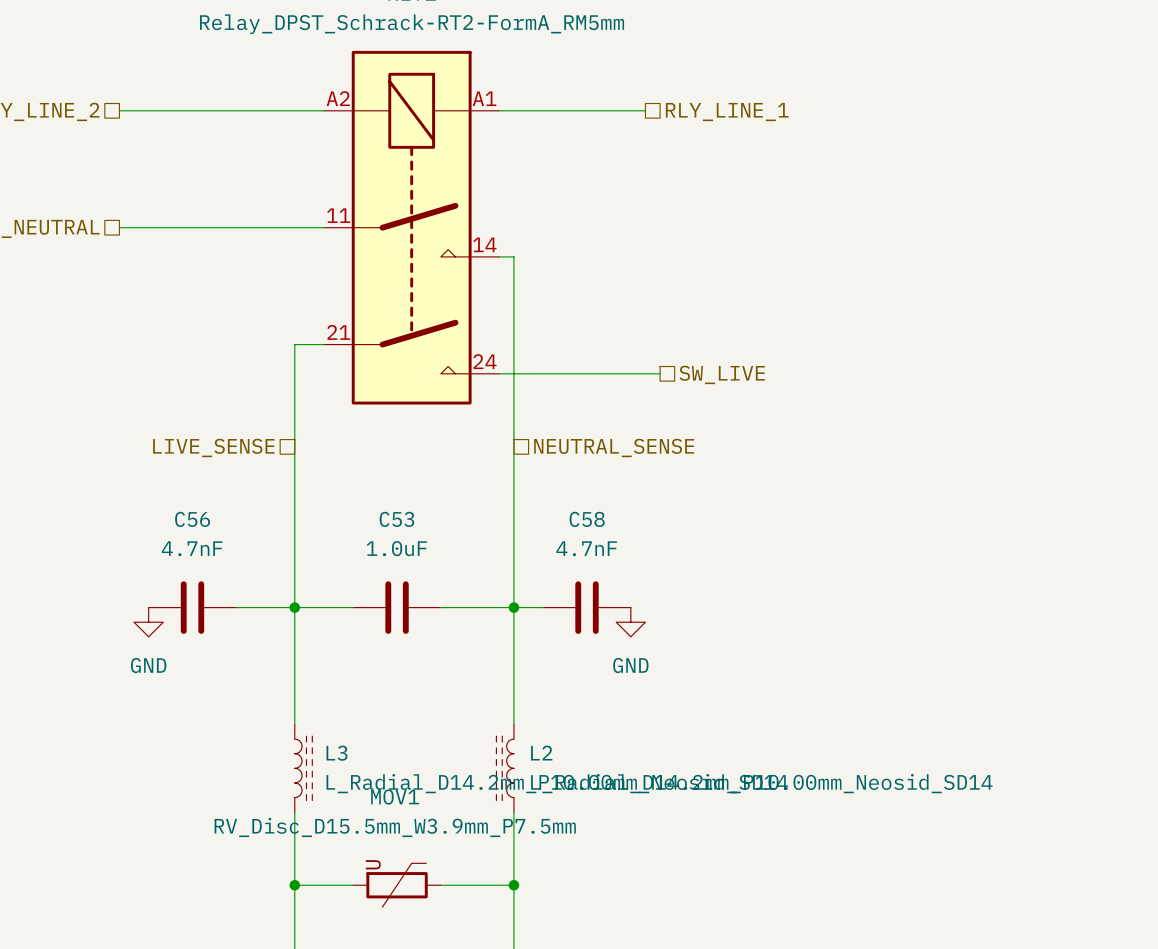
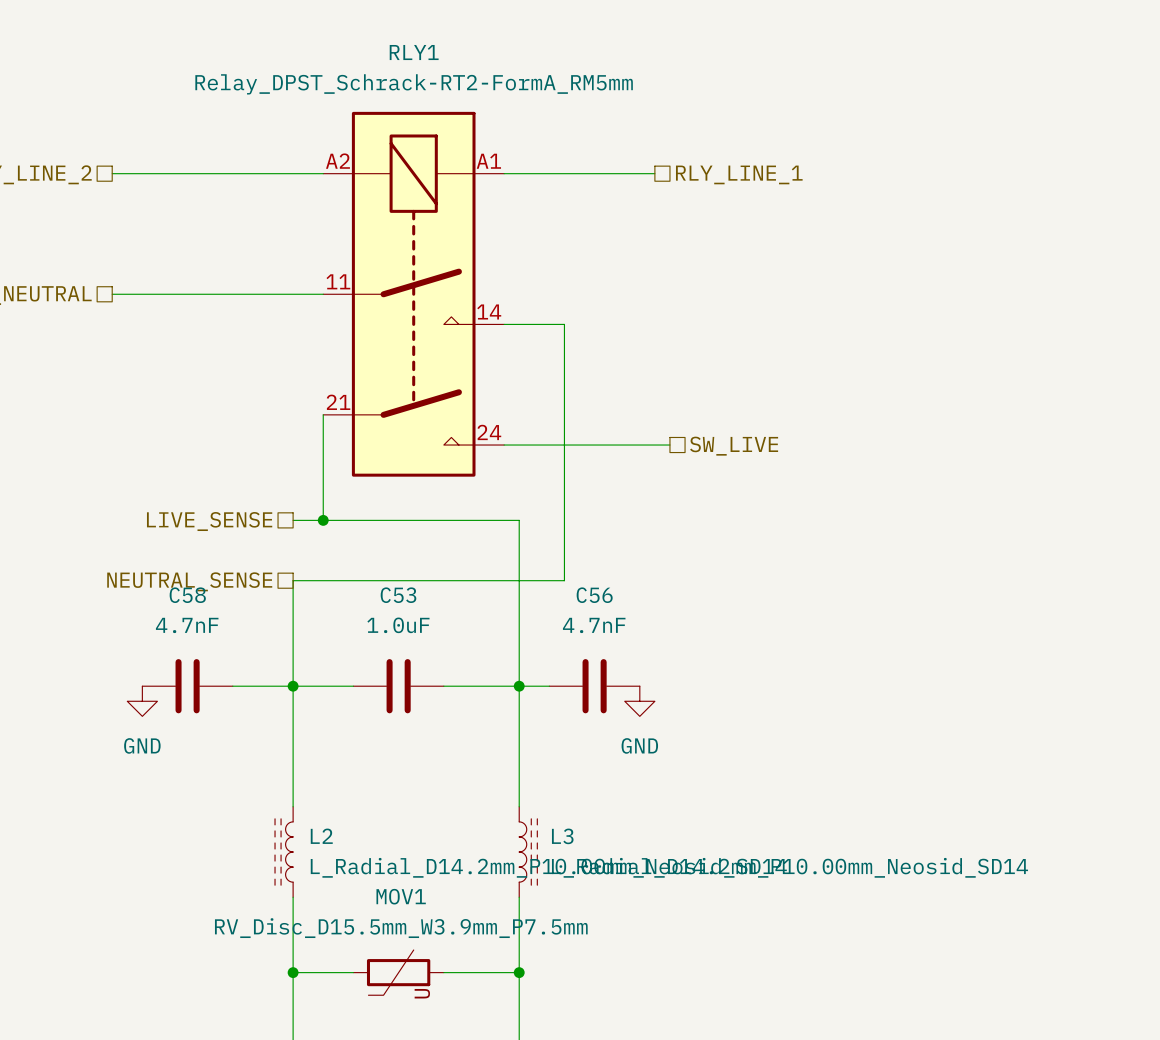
wire: (513, 256) (513, 446) -> (519, 324) (564, 324) (564, 580) (293, 580)
wire: (324, 344) (294, 344) (294, 505) -> (323, 414) (323, 520)
wire: none -> (293, 520) (519, 520)
junction: none -> (323, 520)
hierarchical label rotation: 0° (614, 447) -> 180° (189, 581)
hierarchical label position: NEUTRAL_SENSE (614, 447) -> NEUTRAL_SENSE (189, 581)
C56 name: C56 (192, 519) -> C58 (187, 595)
C58 name: C58 (587, 519) -> C56 (594, 595)
L3 position: (303, 768) -> (528, 852)
L2 position: (505, 768) -> (284, 852)
MOV1 rotation: 0° (397, 885) -> 180° (398, 972)

